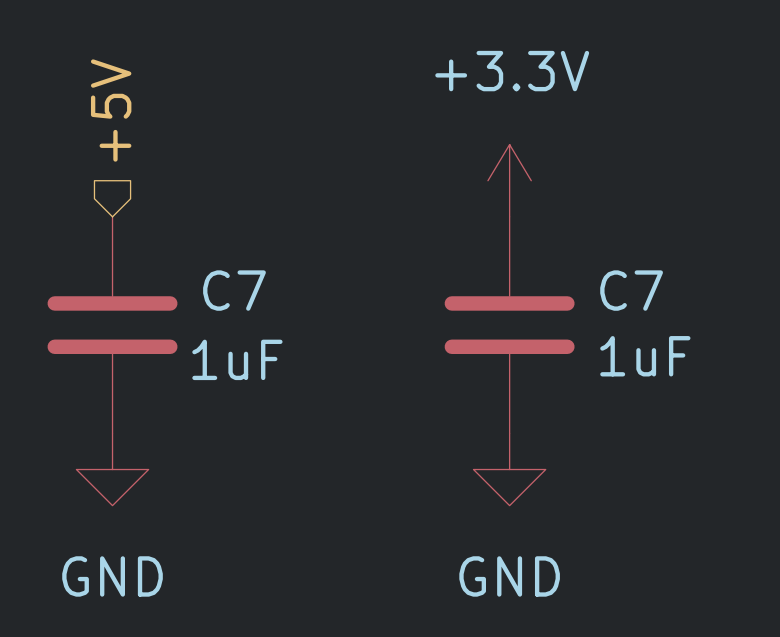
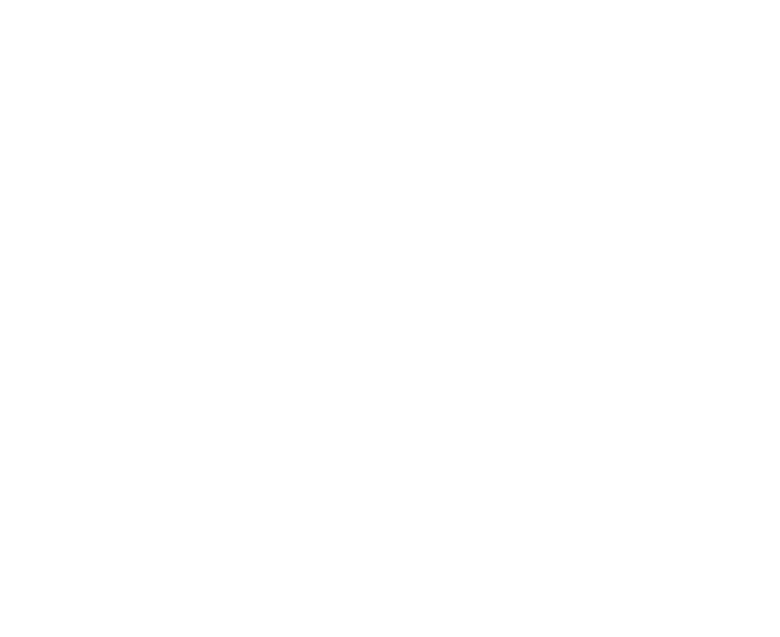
hierarchical label: +5V (111, 110) -> none
power symbol: +3.3V (509, 180) -> none
C7: 1uF (112, 325) -> none
C7: 1uF (509, 325) -> none
power symbol: GND (112, 469) -> none
power symbol: GND (509, 469) -> none

